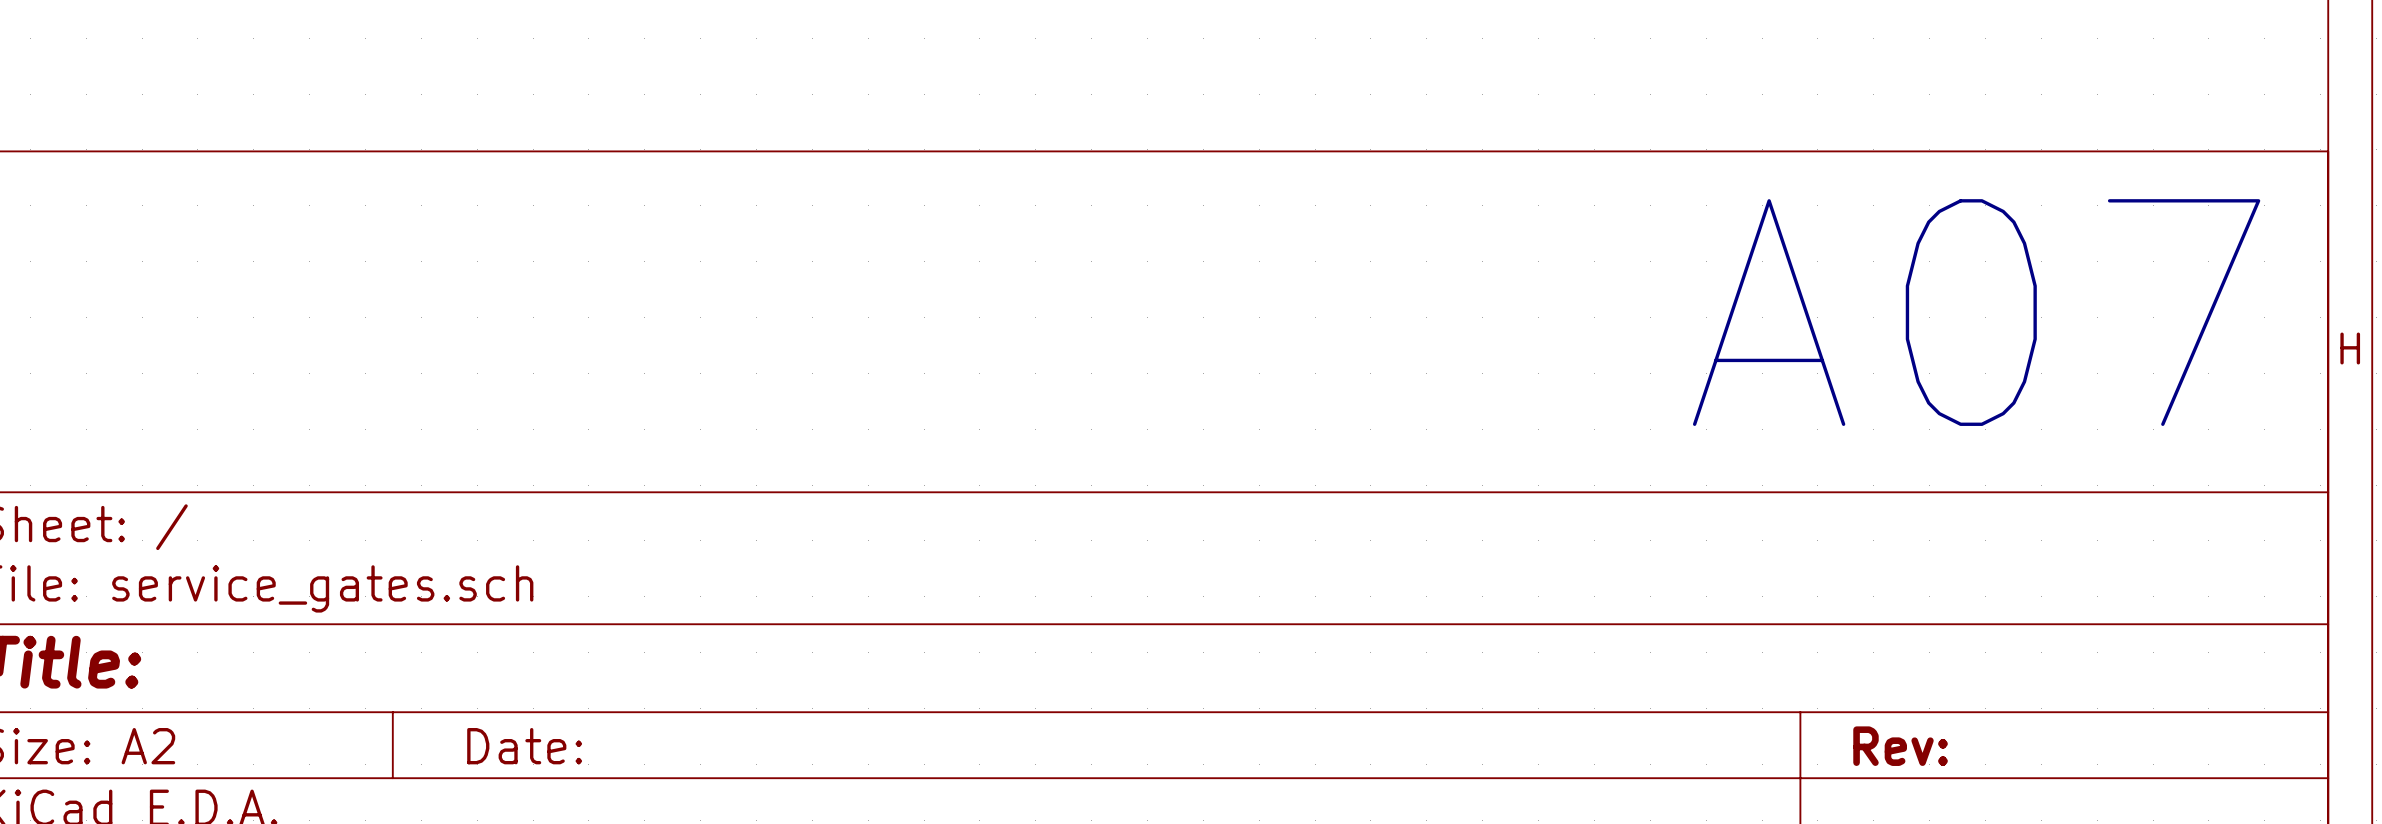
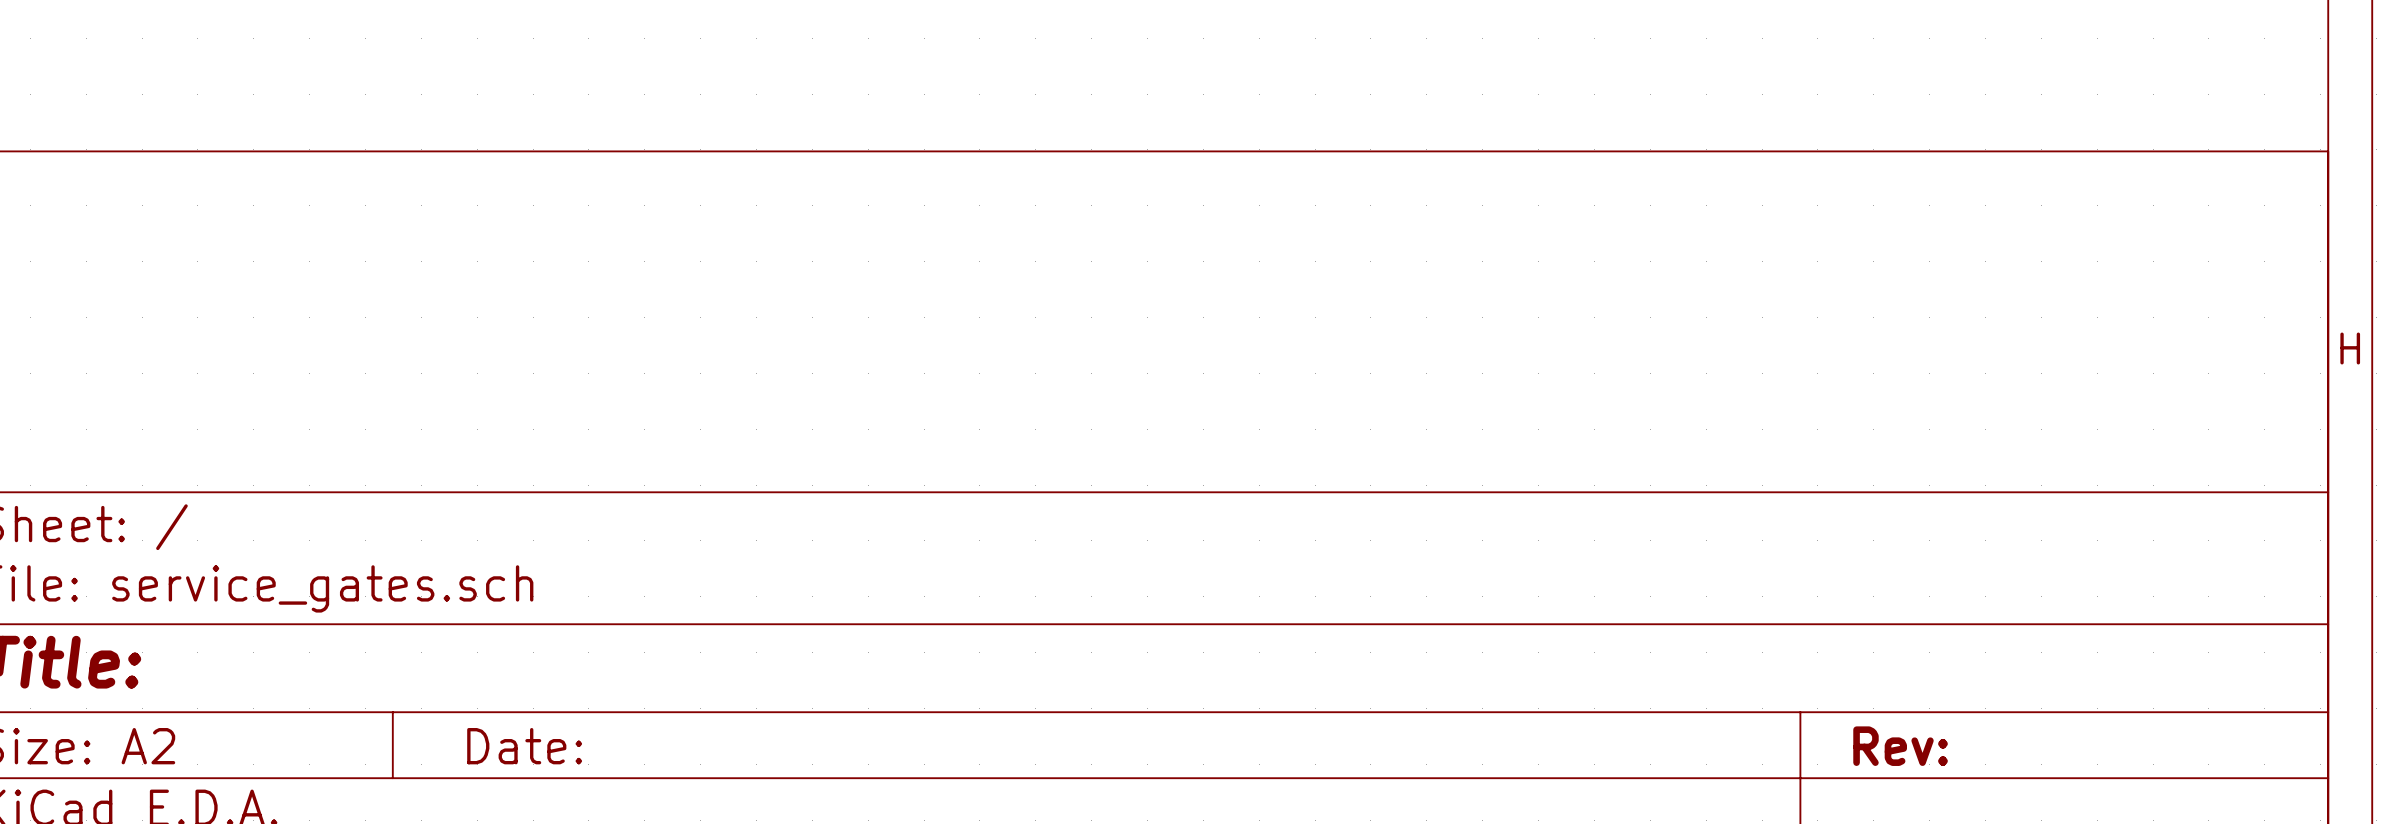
text: A07 (1976, 312) -> none

